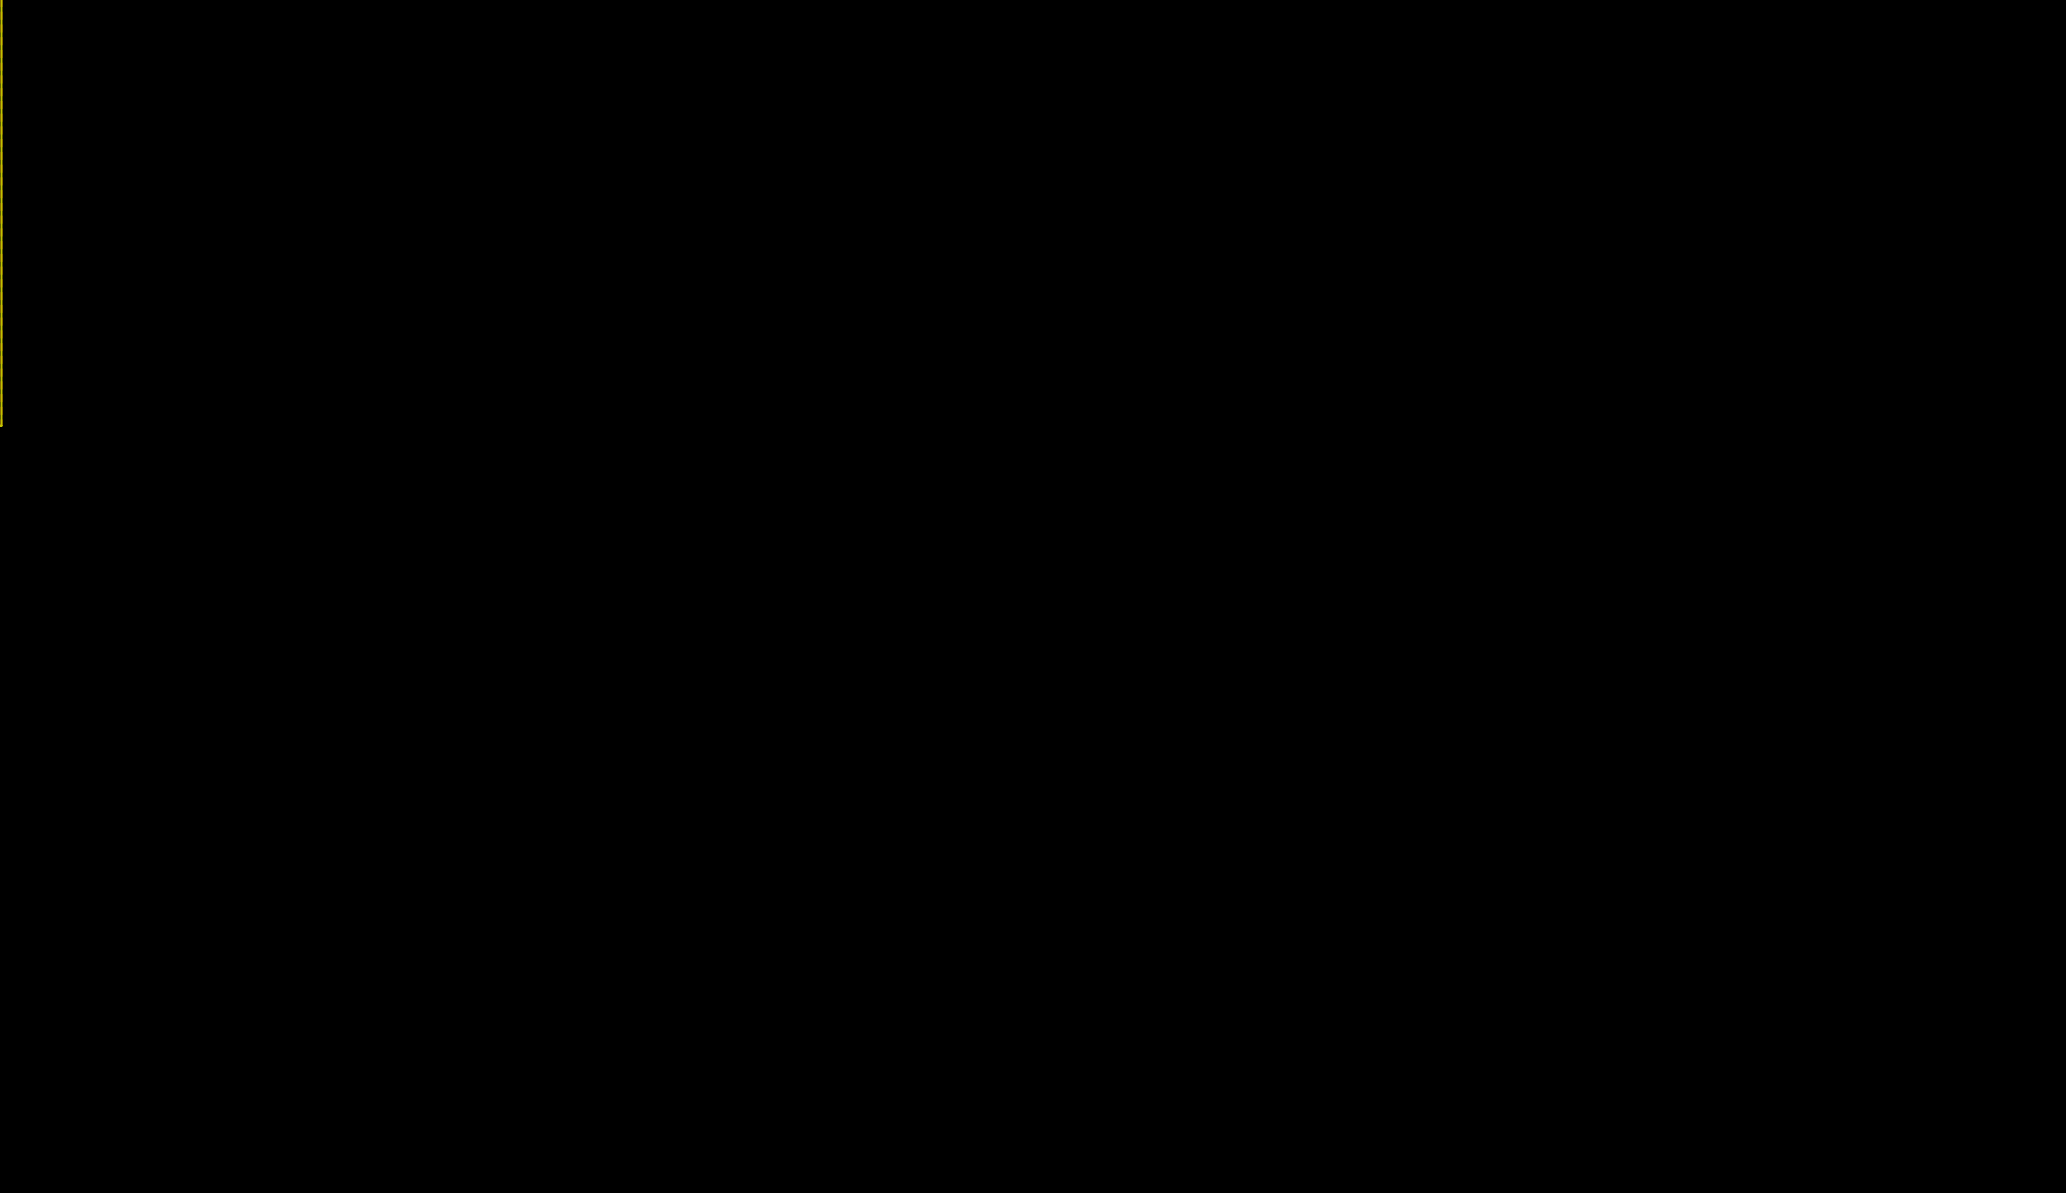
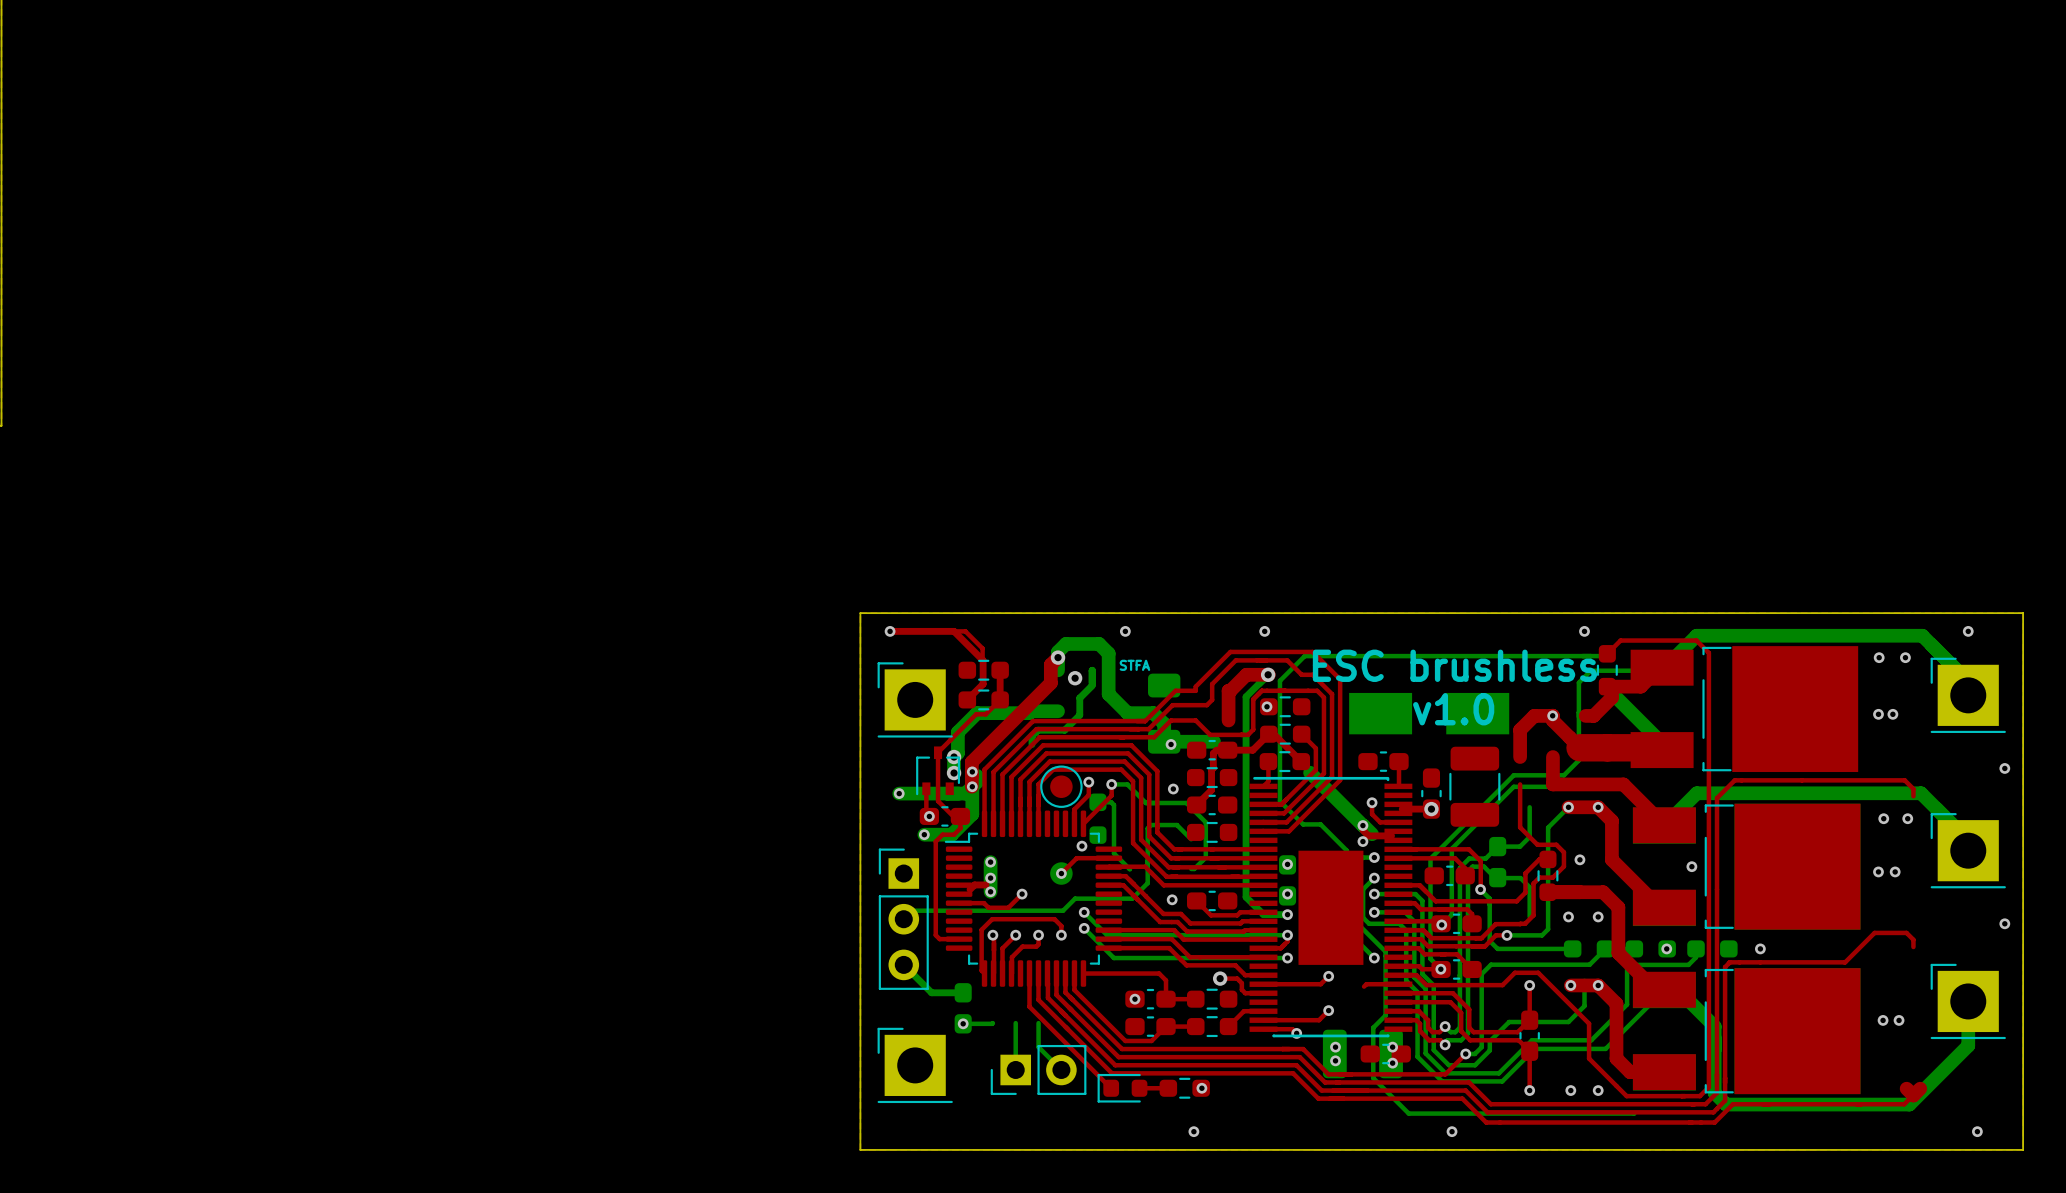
board edge: none -> (860, 613) (860, 1149) (2023, 1149) (2023, 613) (860, 613)
top track: none -> (890, 631) (965, 631) (982, 648) (982, 684) (967, 699) (983, 684) (983, 660) (954, 631) (890, 631)
via: none -> (890, 631)
via: none -> (1125, 631)
via: none -> (1264, 631)
via: none -> (1584, 631)
via: none -> (1968, 631)
bottom track: none -> (1609, 649) (1609, 656) (1304, 656) (1279, 680) (1279, 801) (1303, 824) (1320, 824) (1346, 850) (1346, 930) (1374, 958)
top track: none -> (1607, 653) (1620, 640) (1696, 640) (1708, 653) (1708, 1087) (1699, 1096) (1626, 1096) (1589, 1058) (1589, 1023) (1538, 972) (1514, 972) (1502, 985) (1426, 985) (1416, 975) (1398, 975)
top track: none -> (1058, 657) (1050, 664) (1050, 683) (971, 762) (971, 786)
via: none -> (1058, 657)
via: none -> (1879, 657)
via: none -> (1905, 657)
text: none -> STFA (1134, 665)
text: none -> ESC brushless (1454, 665)
top track: none -> (1662, 665) (1640, 686) (1611, 686) (1611, 697) (1593, 715) (1585, 715)
part: none -> (983, 670)
top track: none -> (1000, 670) (1000, 699) (985, 714) (976, 714) (938, 752) (938, 801) (953, 816) (960, 816) (960, 828) (954, 834) (942, 834) (935, 841) (935, 935) (939, 939) (959, 939)
bottom track: none -> (1058, 670) (1058, 651) (1065, 643) (1099, 643) (1108, 653) (1108, 694) (1127, 713) (1153, 713) (1164, 723) (1164, 741) (1214, 741)
part: none -> (1607, 670)
top track: none -> (1268, 674) (1246, 674) (1228, 690) (1228, 720)
bottom track: none -> (1268, 674) (1246, 696) (1246, 897) (1263, 914) (1287, 913)
via: none -> (1268, 674)
via: none -> (1075, 678)
bottom track: none -> (1609, 688) (1662, 743) (1662, 752)
bottom track: none -> (1968, 695) (1968, 681) (1922, 635) (1696, 635) (1661, 670) (1590, 670) (1578, 682) (1578, 760) (1563, 775) (1513, 775) (1430, 858) (1430, 958) (1440, 969)
part: none -> (1968, 695)
bottom track: none -> (1080, 698) (1092, 687) (1092, 670) (1092, 685) (1079, 698) (1079, 715) (1064, 730) (1038, 730) (1032, 736) (1032, 744)
part: none -> (915, 699)
part: none -> (983, 699)
via: none -> (1266, 706)
part: none -> (1285, 706)
text: none -> v1.0 (1453, 709)
part: none -> (1744, 709)
bottom track: none -> (1058, 711) (977, 713) (957, 732) (957, 753) (954, 757) (954, 773)
part: none -> (1164, 713)
part: none -> (1429, 713)
via: none -> (1878, 714)
via: none -> (1892, 714)
top track: none -> (1552, 715) (1534, 715) (1520, 730) (1520, 757)
top track: none -> (1552, 715) (1552, 720) (1580, 747) (1662, 747)
via: none -> (1552, 715)
part: none -> (1285, 734)
top track: none -> (1301, 734) (1315, 748) (1315, 770) (1281, 804) (1263, 804)
via: none -> (1171, 744)
part: none -> (1212, 750)
via: none -> (954, 757)
top track: none -> (1552, 757) (1552, 784) (1623, 784) (1664, 825)
top track: none -> (1268, 761) (1268, 781) (1263, 786)
part: none -> (1284, 761)
top track: none -> (1301, 761) (1273, 734) (1268, 734) (1252, 750) (1216, 750) (1213, 753) (1211, 790) (1196, 805)
part: none -> (1383, 761)
top track: none -> (1399, 761) (1398, 786)
via: none -> (2004, 768)
part: none -> (938, 770)
bottom track: none -> (972, 771) (972, 814) (951, 834) (924, 834)
via: none -> (972, 771)
bottom track: none -> (1310, 772) (1372, 834)
via: none -> (954, 773)
bottom track: none -> (976, 775) (976, 782) (965, 793) (899, 793)
part: none -> (1212, 777)
top track: none -> (1088, 782) (1088, 794) (1074, 809) (1074, 823)
via: none -> (1088, 782)
top track: none -> (1111, 784) (1111, 795) (1083, 823)
bottom track: none -> (1111, 784) (1127, 784) (1145, 803) (1186, 803) (1205, 822) (1205, 857) (1194, 868) (1191, 868)
via: none -> (1111, 784)
top track: none -> (1520, 784) (1520, 827) (1537, 844) (1556, 844) (1563, 852) (1563, 866) (1552, 877) (1539, 877) (1533, 883) (1533, 915) (1525, 923) (1495, 924) (1481, 938) (1431, 938) (1423, 930) (1398, 930)
via: none -> (972, 786)
part: none -> (1061, 786)
part: none -> (1474, 786)
top track: none -> (926, 788) (926, 813) (929, 816)
via: none -> (1173, 789)
via: none -> (899, 793)
part: none -> (1431, 793)
top track: none -> (1913, 796) (1913, 789) (1904, 780) (1734, 780) (1716, 798) (1716, 1092) (1705, 1104) (1490, 1104) (1469, 1082) (1325, 1082) (1299, 1057) (1118, 1057) (1056, 994) (1056, 973)
bottom track: none -> (1100, 802) (1111, 802) (1114, 805) (1114, 853) (1129, 869)
top track: none -> (1372, 802) (1372, 814) (1380, 822) (1398, 822)
via: none -> (1372, 802)
part: none -> (1212, 805)
bottom track: none -> (1529, 807) (1529, 836) (1520, 846) (1497, 846) (1485, 858) (1469, 858) (1459, 867) (1459, 1027) (1455, 1032) (1450, 1032) (1445, 1026)
top track: none -> (1568, 807) (1598, 807) (1611, 820) (1611, 859) (1659, 907) (1664, 907)
bottom track: none -> (1568, 807) (1548, 827) (1548, 929) (1542, 935) (1507, 935)
via: none -> (1568, 807)
via: none -> (1598, 807)
top track: none -> (1402, 809) (1431, 809)
via: none -> (1431, 809)
top track: none -> (1263, 813) (1284, 813) (1323, 773) (1323, 697) (1317, 690) (1261, 690) (1253, 699) (1253, 729) (1248, 734) (1210, 734) (1195, 720) (1171, 720) (1154, 737) (1039, 737) (1002, 774) (1002, 823)
via: none -> (929, 816)
part: none -> (944, 816)
part: none -> (1097, 818)
via: none -> (1883, 818)
via: none -> (1907, 818)
top track: none -> (1263, 822) (1286, 822) (1332, 776) (1332, 694) (1312, 674) (1301, 674) (1287, 660) (1235, 660) (1212, 684) (1212, 699) (1206, 705) (1172, 705) (1148, 729) (1036, 729) (993, 772) (993, 823)
top track: none -> (984, 823) (984, 769) (1033, 721) (1145, 721) (1175, 690) (1195, 690) (1195, 686) (1230, 651) (1312, 651) (1340, 679) (1340, 780) (1289, 831) (1263, 831)
top track: none -> (1011, 823) (1011, 776) (1043, 745) (1131, 745) (1157, 771) (1157, 832) (1174, 849) (1263, 849)
top track: none -> (1020, 823) (1020, 779) (1046, 753) (1128, 753) (1149, 774) (1149, 836) (1171, 858) (1263, 858)
top track: none -> (1029, 823) (1029, 781) (1049, 761) (1124, 761) (1141, 777) (1141, 839) (1168, 867) (1263, 867)
top track: none -> (1038, 823) (1038, 784) (1053, 769) (1121, 769) (1133, 781) (1133, 843) (1166, 876) (1263, 876)
via: none -> (1362, 825)
top track: none -> (1362, 830) (1368, 835) (1391, 835)
part: none -> (1212, 832)
via: none -> (924, 834)
bottom track: none -> (1191, 839) (1176, 825) (1151, 825) (1147, 828) (1147, 883) (1132, 898) (1075, 898) (1063, 910) (912, 910) (903, 919)
via: none -> (1362, 841)
via: none -> (1081, 846)
top track: none -> (1398, 849) (1468, 849) (1480, 861) (1480, 884)
bottom track: none -> (1968, 850) (1968, 840) (1921, 793) (1696, 793) (1664, 825) (1625, 786) (1513, 786) (1451, 848) (1451, 914) (1441, 924)
part: none -> (1968, 850)
bottom track: none -> (1374, 857) (1362, 857) (1355, 865) (1355, 921) (1385, 951) (1385, 1015) (1373, 1027) (1373, 1078) (1408, 1113) (1634, 1113)
via: none -> (1374, 857)
top track: none -> (1108, 858) (1076, 858) (1061, 873)
top track: none -> (1398, 858) (1455, 858) (1465, 868) (1465, 875)
top track: none -> (1547, 859) (1539, 859) (1525, 873) (1525, 892) (1516, 901) (1435, 901) (1419, 885) (1398, 885)
via: none -> (1579, 859)
bottom track: none -> (990, 862) (990, 891)
via: none -> (990, 862)
part: none -> (1497, 862)
via: none -> (1287, 864)
via: none -> (1691, 866)
part: none -> (1746, 866)
top track: none -> (1108, 867) (1145, 866) (1163, 885) (1263, 885)
via: none -> (1878, 871)
via: none -> (1895, 871)
part: none -> (1061, 873)
via: none -> (1061, 873)
part: none -> (1449, 875)
part: none -> (1547, 875)
top track: none -> (1108, 876) (1125, 876) (1163, 913) (1180, 913) (1190, 923) (1263, 921)
via: none -> (990, 878)
bottom track: none -> (1374, 878) (1363, 889) (1363, 917) (1369, 923) (1399, 923) (1406, 930) (1406, 980) (1417, 992) (1417, 1056) (1442, 1081) (1502, 1081) (1534, 1048) (1605, 1048) (1664, 990) (1678, 990) (1714, 1026) (1714, 1093) (1726, 1104) (1909, 1104) (1968, 1045) (1968, 1001)
via: none -> (1374, 878)
part: none -> (1287, 880)
top track: none -> (986, 884) (974, 884) (970, 889)
top track: none -> (1108, 885) (1123, 885) (1160, 922) (1177, 922) (1187, 931) (1263, 930)
bottom track: none -> (1480, 889) (1489, 898) (1489, 940) (1497, 948) (1572, 948)
via: none -> (1480, 889)
via: none -> (990, 891)
top track: none -> (1547, 892) (1603, 892) (1618, 907) (1618, 953) (1655, 989) (1664, 989)
top track: none -> (1022, 894) (1008, 907) (988, 907) (983, 903) (959, 903)
via: none -> (1022, 894)
via: none -> (1287, 894)
bottom track: none -> (1374, 894) (1415, 894) (1422, 900) (1422, 974) (1433, 985) (1433, 1050) (1448, 1065) (1475, 1065) (1489, 1050) (1489, 1041) (1509, 1022) (1568, 1022) (1584, 1006) (1584, 980)
via: none -> (1374, 894)
part: none -> (1033, 898)
via: none -> (1172, 899)
top track: none -> (1196, 900) (1211, 915) (1237, 915) (1240, 912) (1263, 912)
part: none -> (1212, 900)
top track: none -> (1398, 903) (1414, 903) (1420, 909) (1467, 909) (1472, 914) (1472, 923)
part: none -> (1330, 907)
bottom track: none -> (1084, 912) (1107, 935) (1287, 935)
via: none -> (1084, 912)
bottom track: none -> (1374, 912) (1405, 912) (1414, 921) (1414, 977) (1425, 988) (1425, 1053) (1445, 1073) (1498, 1073) (1531, 1040) (1591, 1040) (1627, 1004) (1627, 967) (1629, 964) (1688, 964) (1696, 957) (1696, 948)
via: none -> (1374, 912)
via: none -> (1287, 914)
bottom track: none -> (1529, 916) (1529, 887) (1520, 878) (1494, 877) (1484, 866) (1472, 866) (1468, 871) (1468, 1033) (1461, 1040) (1447, 1040) (1445, 1044)
via: none -> (1568, 916)
via: none -> (1598, 916)
part: none -> (903, 919)
top track: none -> (1398, 921) (1434, 921)
part: none -> (1456, 923)
via: none -> (2004, 923)
via: none -> (1441, 924)
bottom track: none -> (1084, 928) (1113, 958) (1287, 958)
via: none -> (1084, 928)
top track: none -> (1108, 930) (1174, 930) (1183, 939) (1263, 939)
top track: none -> (992, 935) (993, 973)
via: none -> (992, 935)
top track: none -> (1015, 935) (1002, 948) (1002, 973)
via: none -> (1015, 935)
top track: none -> (1038, 935) (1038, 944) (1036, 946) (1022, 946) (1011, 957) (1011, 973)
via: none -> (1038, 935)
top track: none -> (1061, 935) (1061, 926) (1054, 919) (992, 919) (981, 929) (981, 970) (984, 973)
via: none -> (1061, 935)
top track: none -> (1287, 935) (1287, 941) (1280, 948) (1263, 948)
via: none -> (1287, 935)
top track: none -> (1507, 935) (1495, 935) (1485, 946) (1428, 946) (1421, 939) (1398, 939)
via: none -> (1507, 935)
top track: none -> (1108, 939) (1171, 939) (1189, 957) (1263, 957)
top track: none -> (1913, 947) (1913, 939) (1906, 932) (1874, 932) (1845, 962) (1729, 962) (1725, 967) (1725, 1100) (1713, 1112) (1487, 1112) (1465, 1090) (1321, 1090) (1296, 1065) (1115, 1065) (1047, 997) (1047, 973)
top track: none -> (1108, 948) (1169, 948) (1186, 965) (1235, 965) (1245, 975) (1263, 975)
top track: none -> (1398, 948) (1418, 948) (1424, 954) (1456, 954) (1472, 969)
part: none -> (1589, 948)
bottom track: none -> (1634, 948) (1605, 948) (1589, 964) (1491, 964) (1481, 974) (1481, 1047) (1474, 1053) (1465, 1053)
part: none -> (1650, 948)
via: none -> (1666, 948)
part: none -> (1712, 948)
via: none -> (1760, 948)
via: none -> (1287, 958)
via: none -> (1374, 958)
bottom track: none -> (903, 964) (931, 992) (963, 992)
top track: none -> (1398, 966) (1440, 969)
via: none -> (1440, 969)
part: none -> (1456, 969)
top track: none -> (1029, 973) (1029, 1006) (1110, 1088)
top track: none -> (1038, 973) (1038, 999) (1111, 1073) (1293, 1073) (1318, 1098) (1462, 1098) (1486, 1122) (1714, 1122) (1733, 1104) (1904, 1104) (1913, 1095)
top track: none -> (1065, 973) (1065, 992) (1122, 1049) (1303, 1049) (1328, 1074) (1445, 1074) (1465, 1053)
top track: none -> (1074, 973) (1074, 990) (1125, 1040) (1151, 1040) (1166, 1026) (1195, 1026)
top track: none -> (1083, 973) (1159, 973) (1166, 980) (1166, 999) (1195, 999)
top track: none -> (1327, 975) (1328, 976) (1320, 984) (1263, 984)
via: none -> (1328, 976)
top track: none -> (1220, 978) (1237, 978) (1241, 983) (1241, 989) (1245, 993) (1263, 993)
via: none -> (1220, 978)
top track: none -> (1398, 984) (1366, 984) (1364, 986)
top track: none -> (1529, 985) (1529, 1020) (1517, 1032) (1473, 1032) (1469, 1027) (1469, 1009) (1452, 993) (1398, 993)
via: none -> (1529, 985)
top track: none -> (1570, 985) (1598, 985) (1616, 1003) (1616, 1058) (1630, 1072) (1664, 1072)
via: none -> (1570, 985)
via: none -> (1598, 985)
via: none -> (1134, 999)
part: none -> (1150, 999)
part: none -> (1212, 999)
part: none -> (1968, 1001)
top track: none -> (1398, 1002) (1450, 1002) (1461, 1012) (1461, 1031) (1470, 1040) (1518, 1040) (1529, 1051) (1529, 1090)
part: none -> (963, 1008)
top track: none -> (1328, 1010) (1319, 1020) (1263, 1020)
via: none -> (1328, 1010)
top track: none -> (1263, 1011) (1243, 1011) (1228, 1026)
top track: none -> (1398, 1011) (1419, 1011) (1428, 1020) (1428, 1027) (1432, 1032) (1439, 1032) (1445, 1026)
top track: none -> (1398, 1020) (1416, 1020) (1420, 1023) (1420, 1031) (1429, 1040) (1440, 1040) (1445, 1044)
via: none -> (1883, 1020)
via: none -> (1899, 1020)
via: none -> (963, 1023)
bottom track: none -> (992, 1023) (963, 1023)
bottom track: none -> (1015, 1023) (1015, 1069)
bottom track: none -> (1038, 1023) (1038, 1047) (1061, 1069)
part: none -> (1150, 1026)
part: none -> (1212, 1026)
via: none -> (1445, 1026)
top track: none -> (1263, 1029) (1292, 1029) (1296, 1033)
part: none -> (1746, 1031)
via: none -> (1296, 1033)
part: none -> (1529, 1035)
via: none -> (1445, 1044)
via: none -> (1335, 1047)
via: none -> (1392, 1047)
part: none -> (1362, 1053)
part: none -> (1385, 1053)
via: none -> (1465, 1053)
via: none -> (1335, 1060)
via: none -> (1392, 1063)
part: none -> (915, 1065)
part: none -> (1038, 1069)
part: none -> (1122, 1088)
top track: none -> (1139, 1088) (1168, 1088)
part: none -> (1184, 1088)
via: none -> (1201, 1088)
top track: none -> (1906, 1088) (1913, 1095)
top track: none -> (1920, 1088) (1913, 1095)
via: none -> (1529, 1090)
via: none -> (1570, 1090)
via: none -> (1598, 1090)
via: none -> (1193, 1131)
via: none -> (1452, 1131)
via: none -> (1977, 1131)

